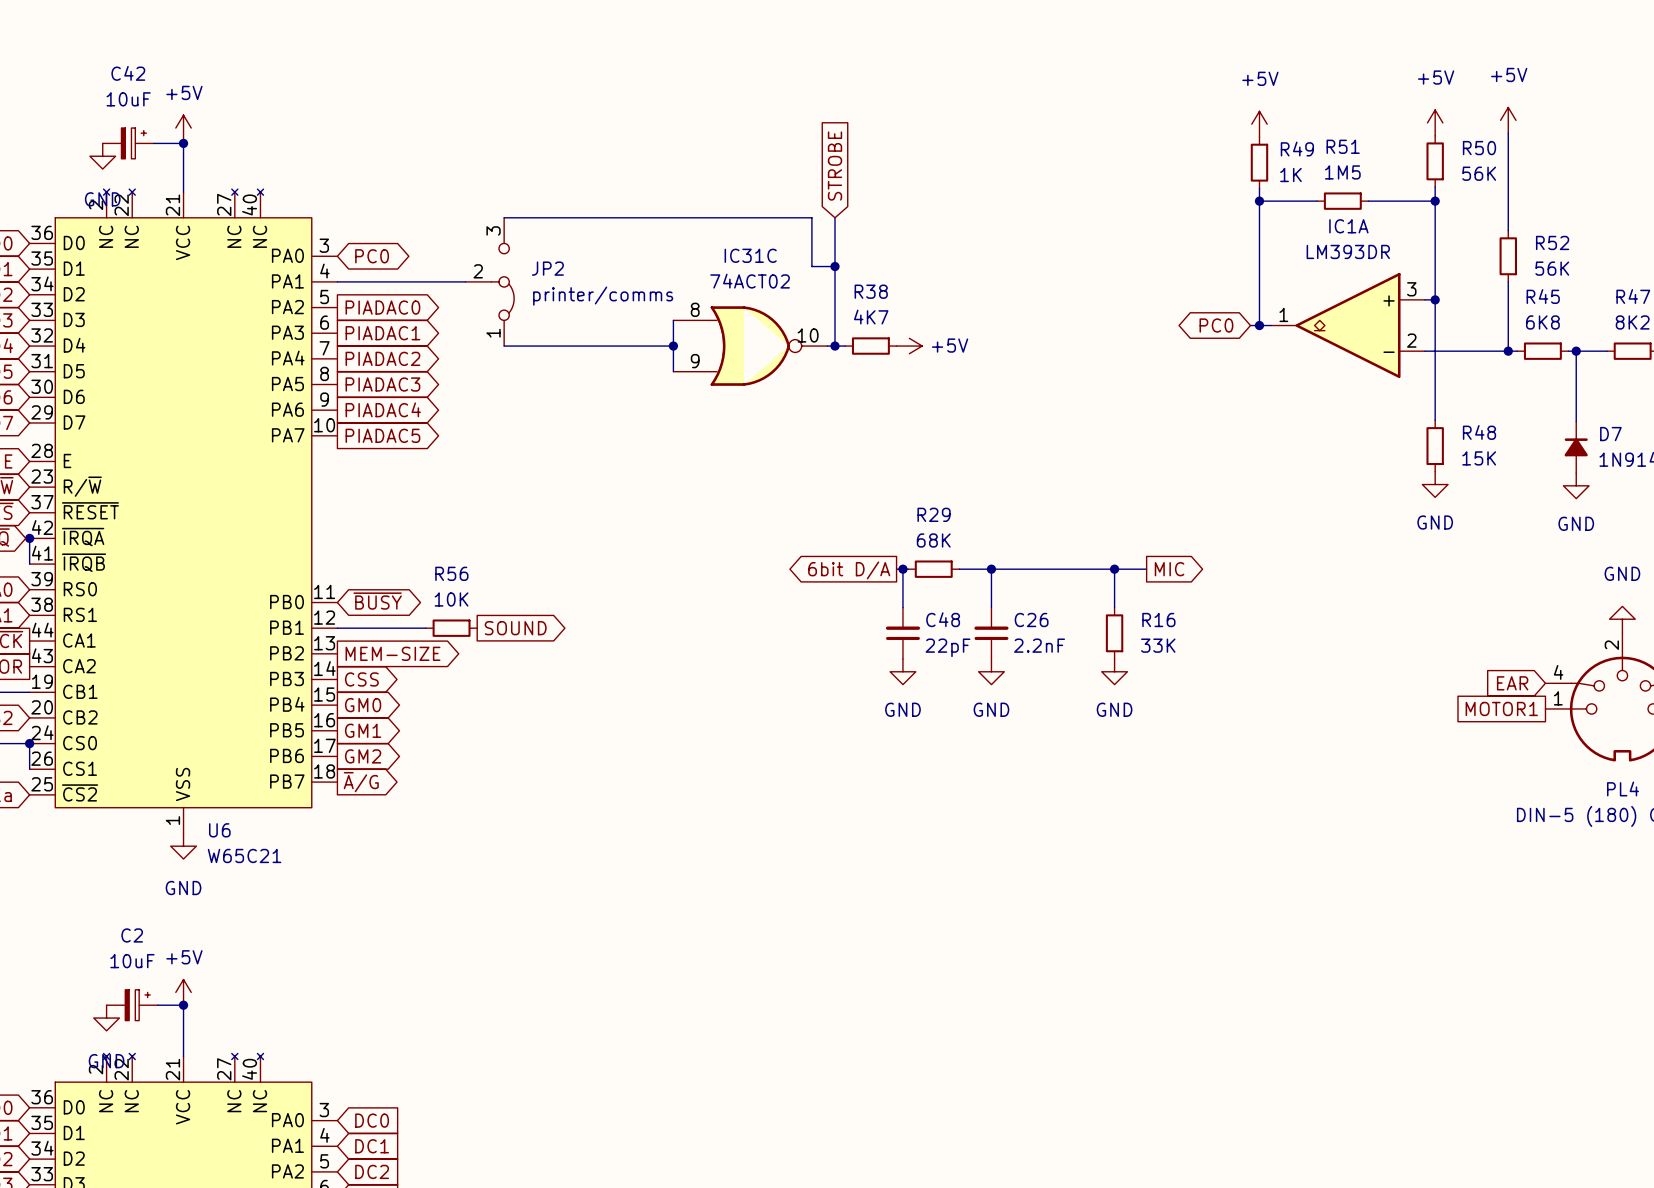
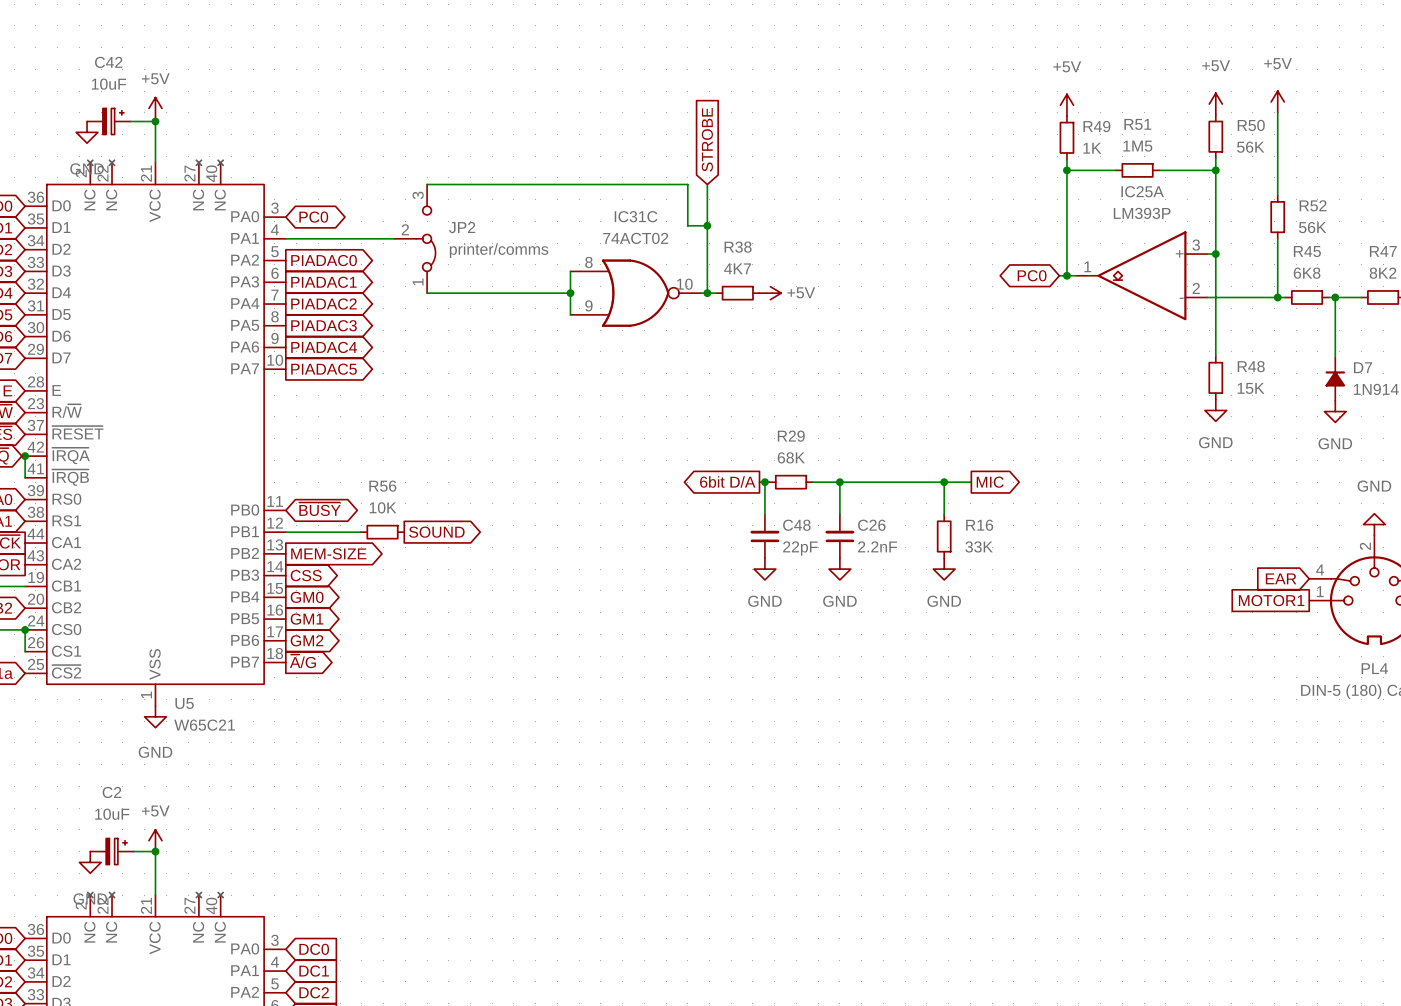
IC1A name: IC1A (1348, 226) -> IC25A (1142, 191)
IC1A value: LM393DR (1348, 251) -> LM393P (1142, 213)
U6 name: U6 (219, 830) -> U5 (184, 703)

